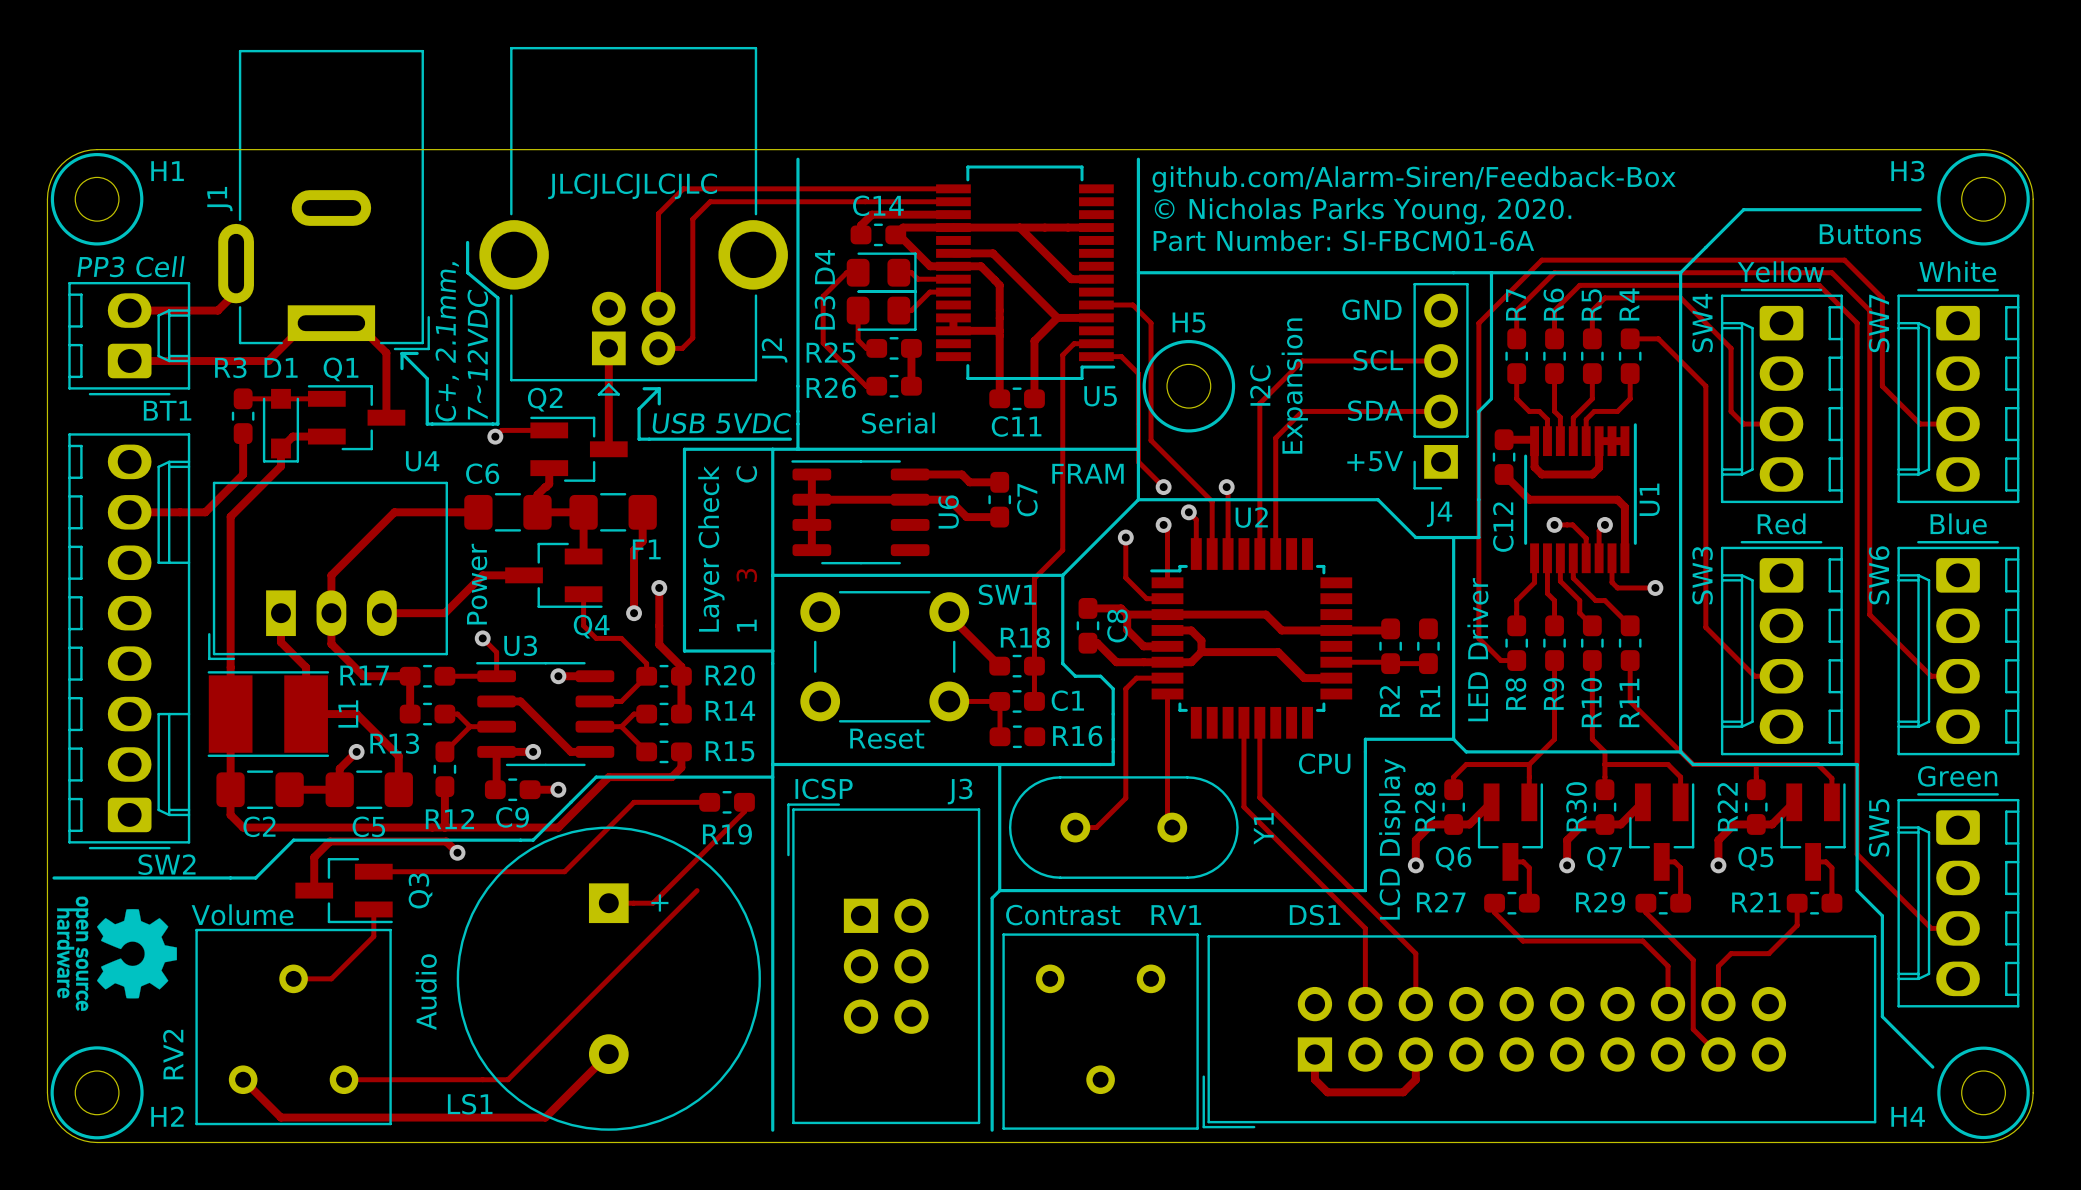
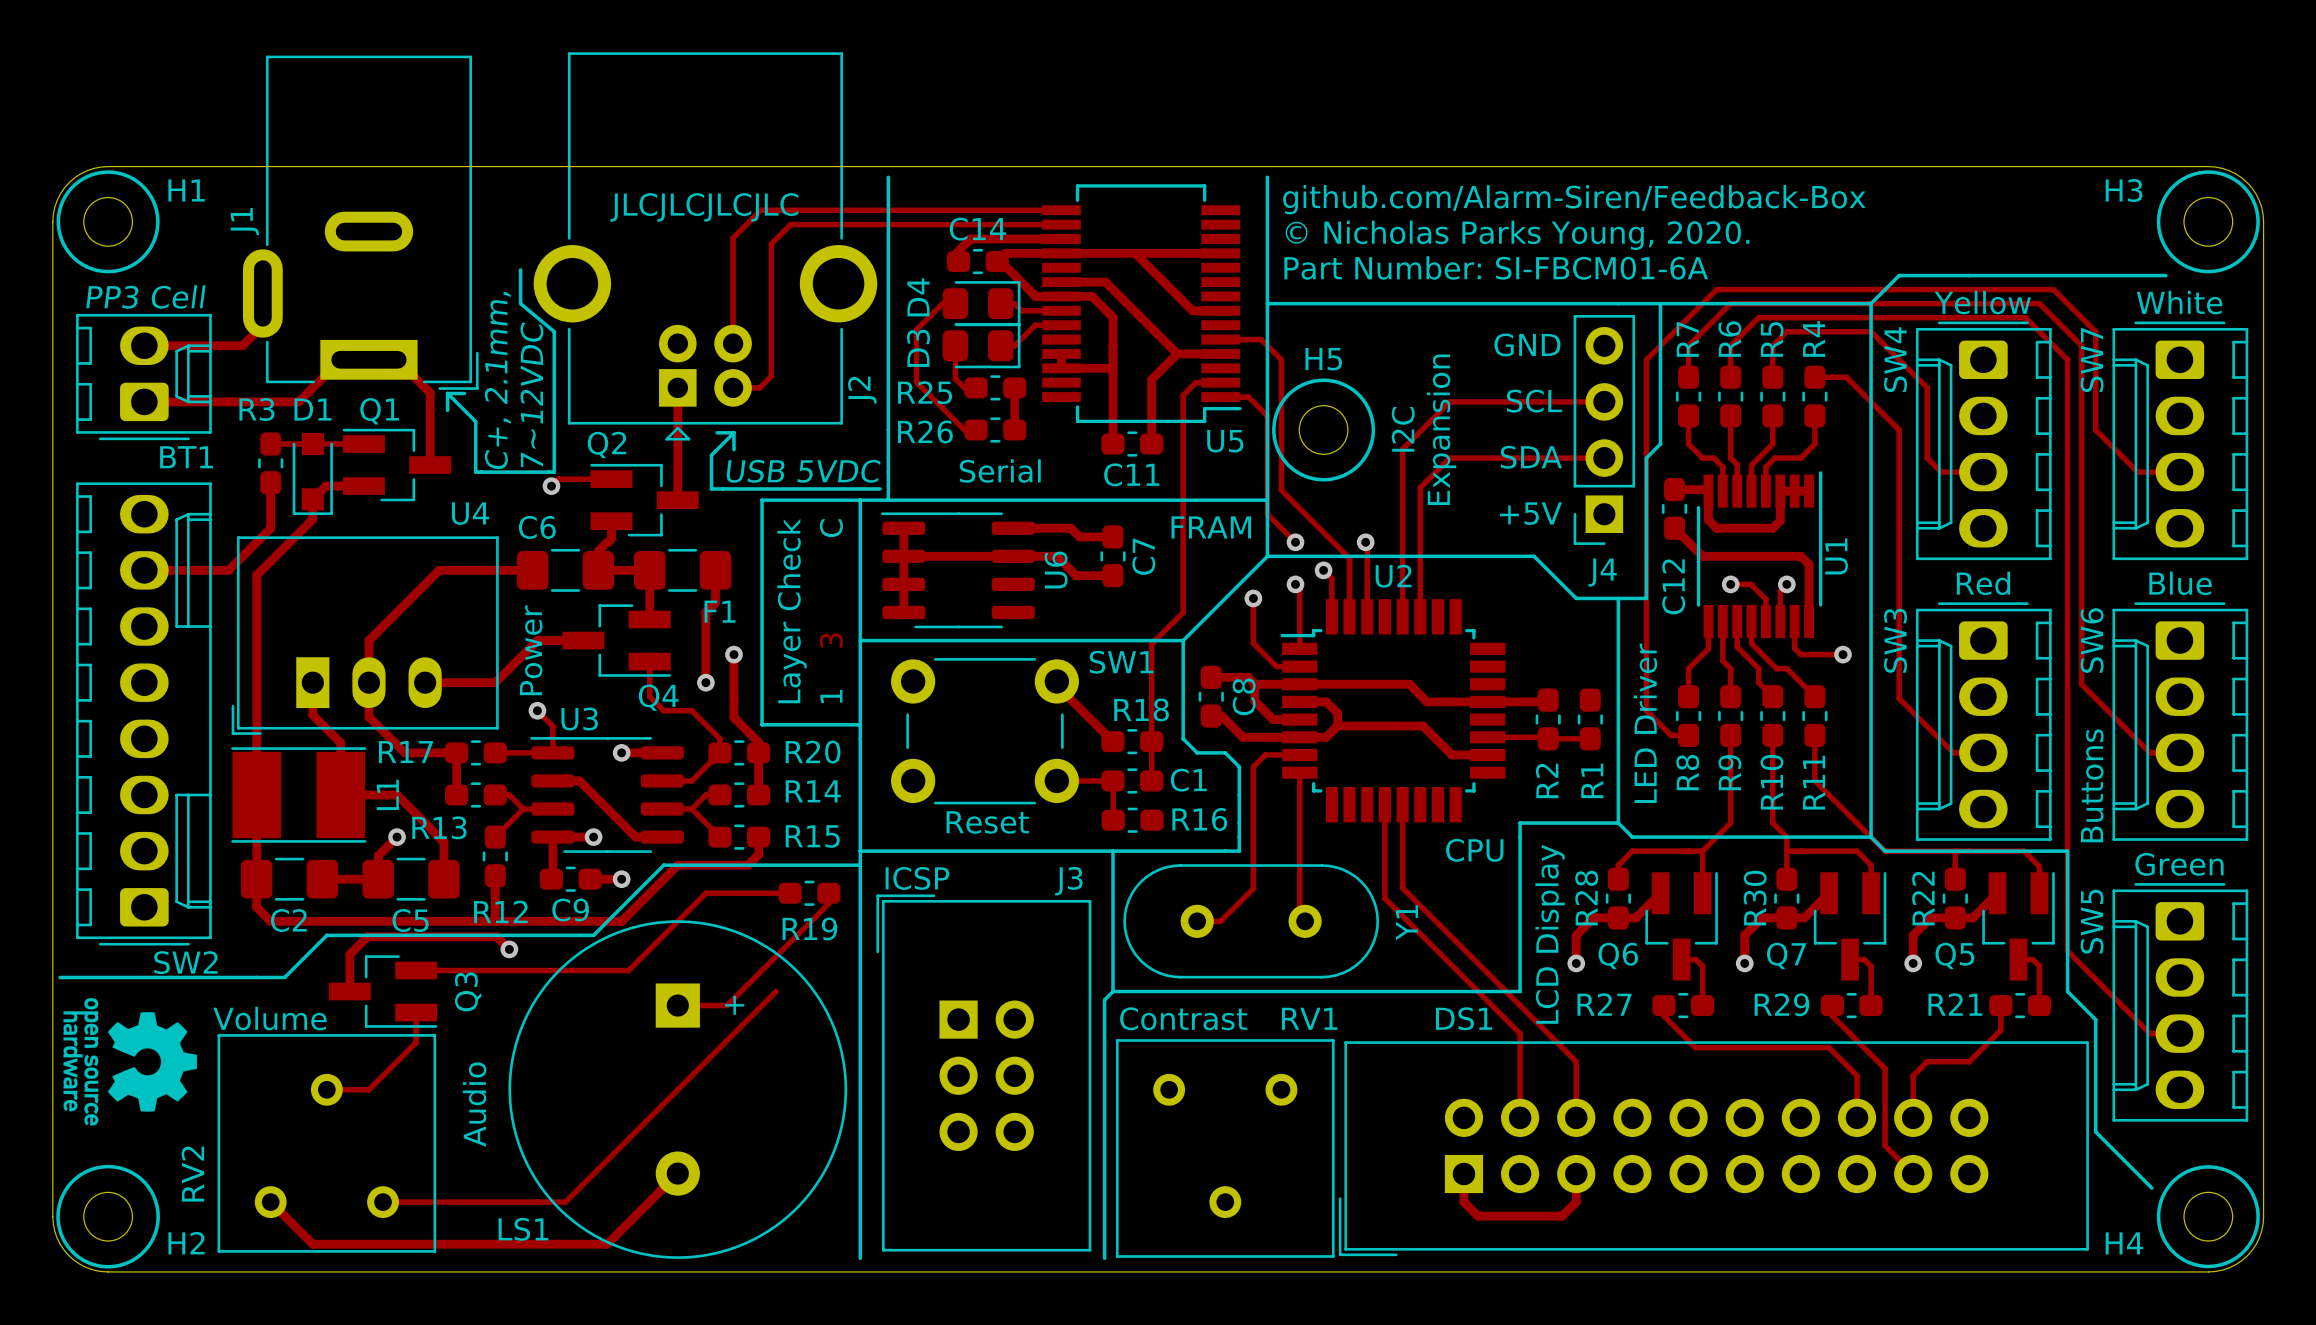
line: (1920, 209) (1743, 209) (1705, 247) -> (2165, 275) (1899, 275)
text rotation: 0° (1870, 234) -> 90° counterclockwise (2092, 785)
text position: Buttons (1870, 234) -> Buttons (2092, 785)

